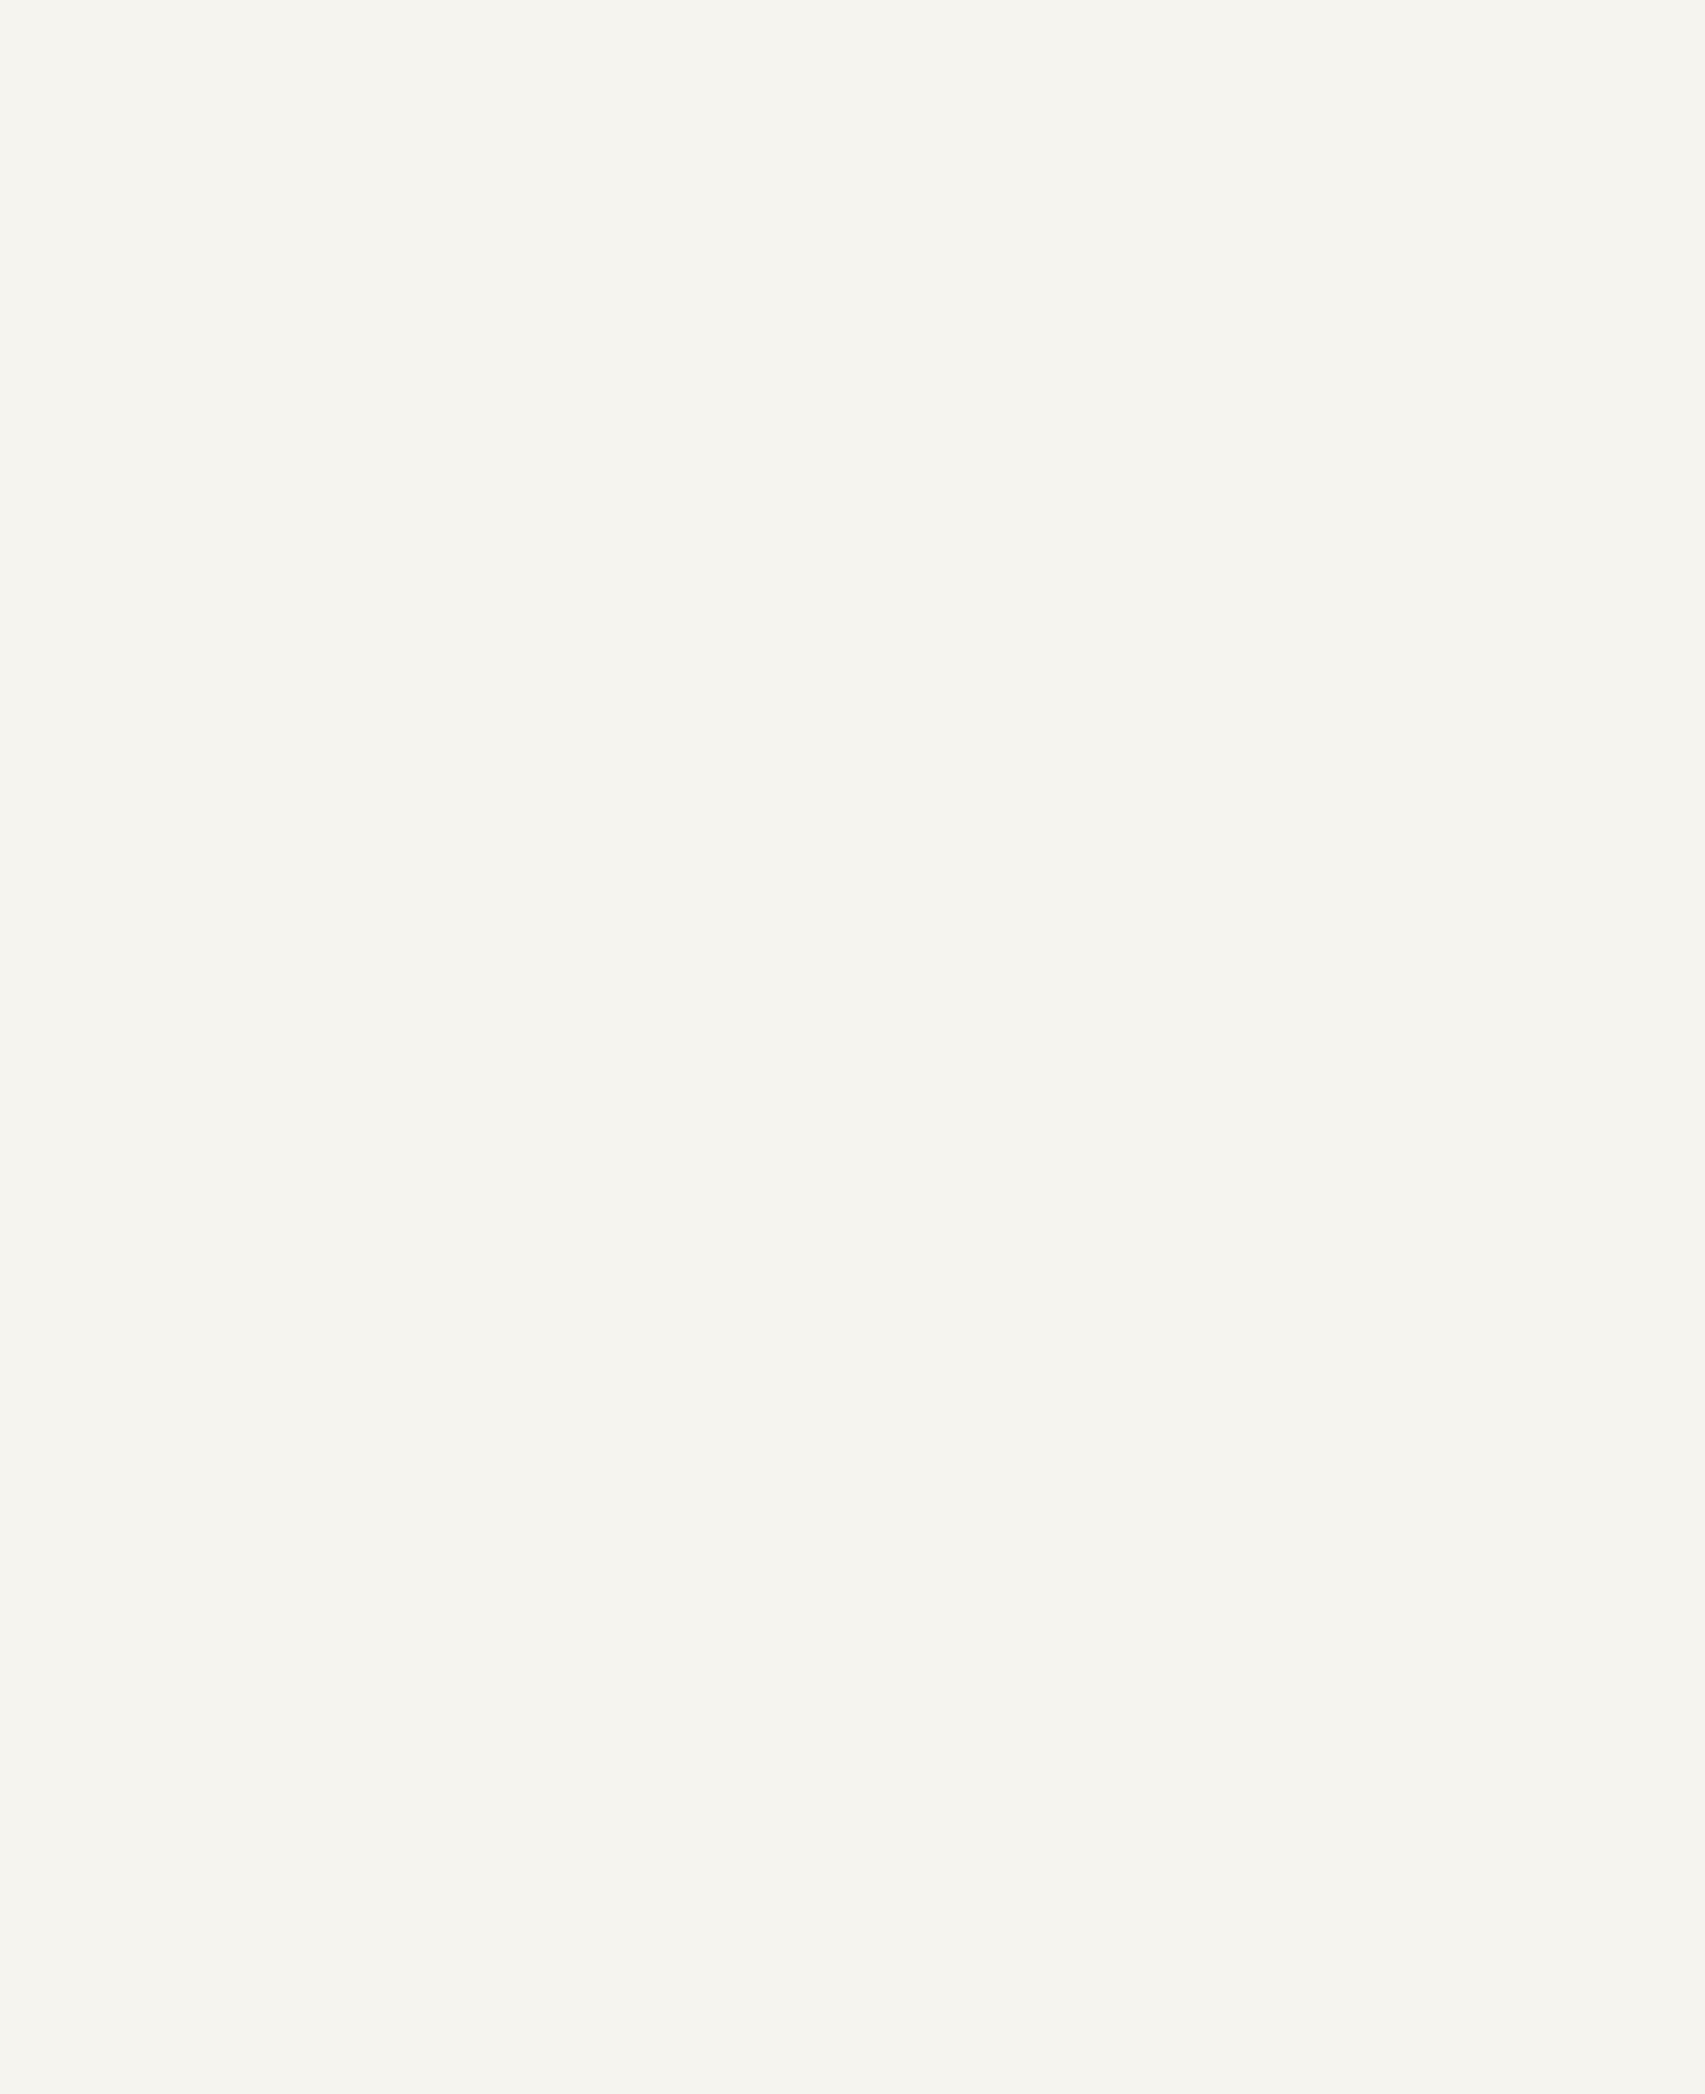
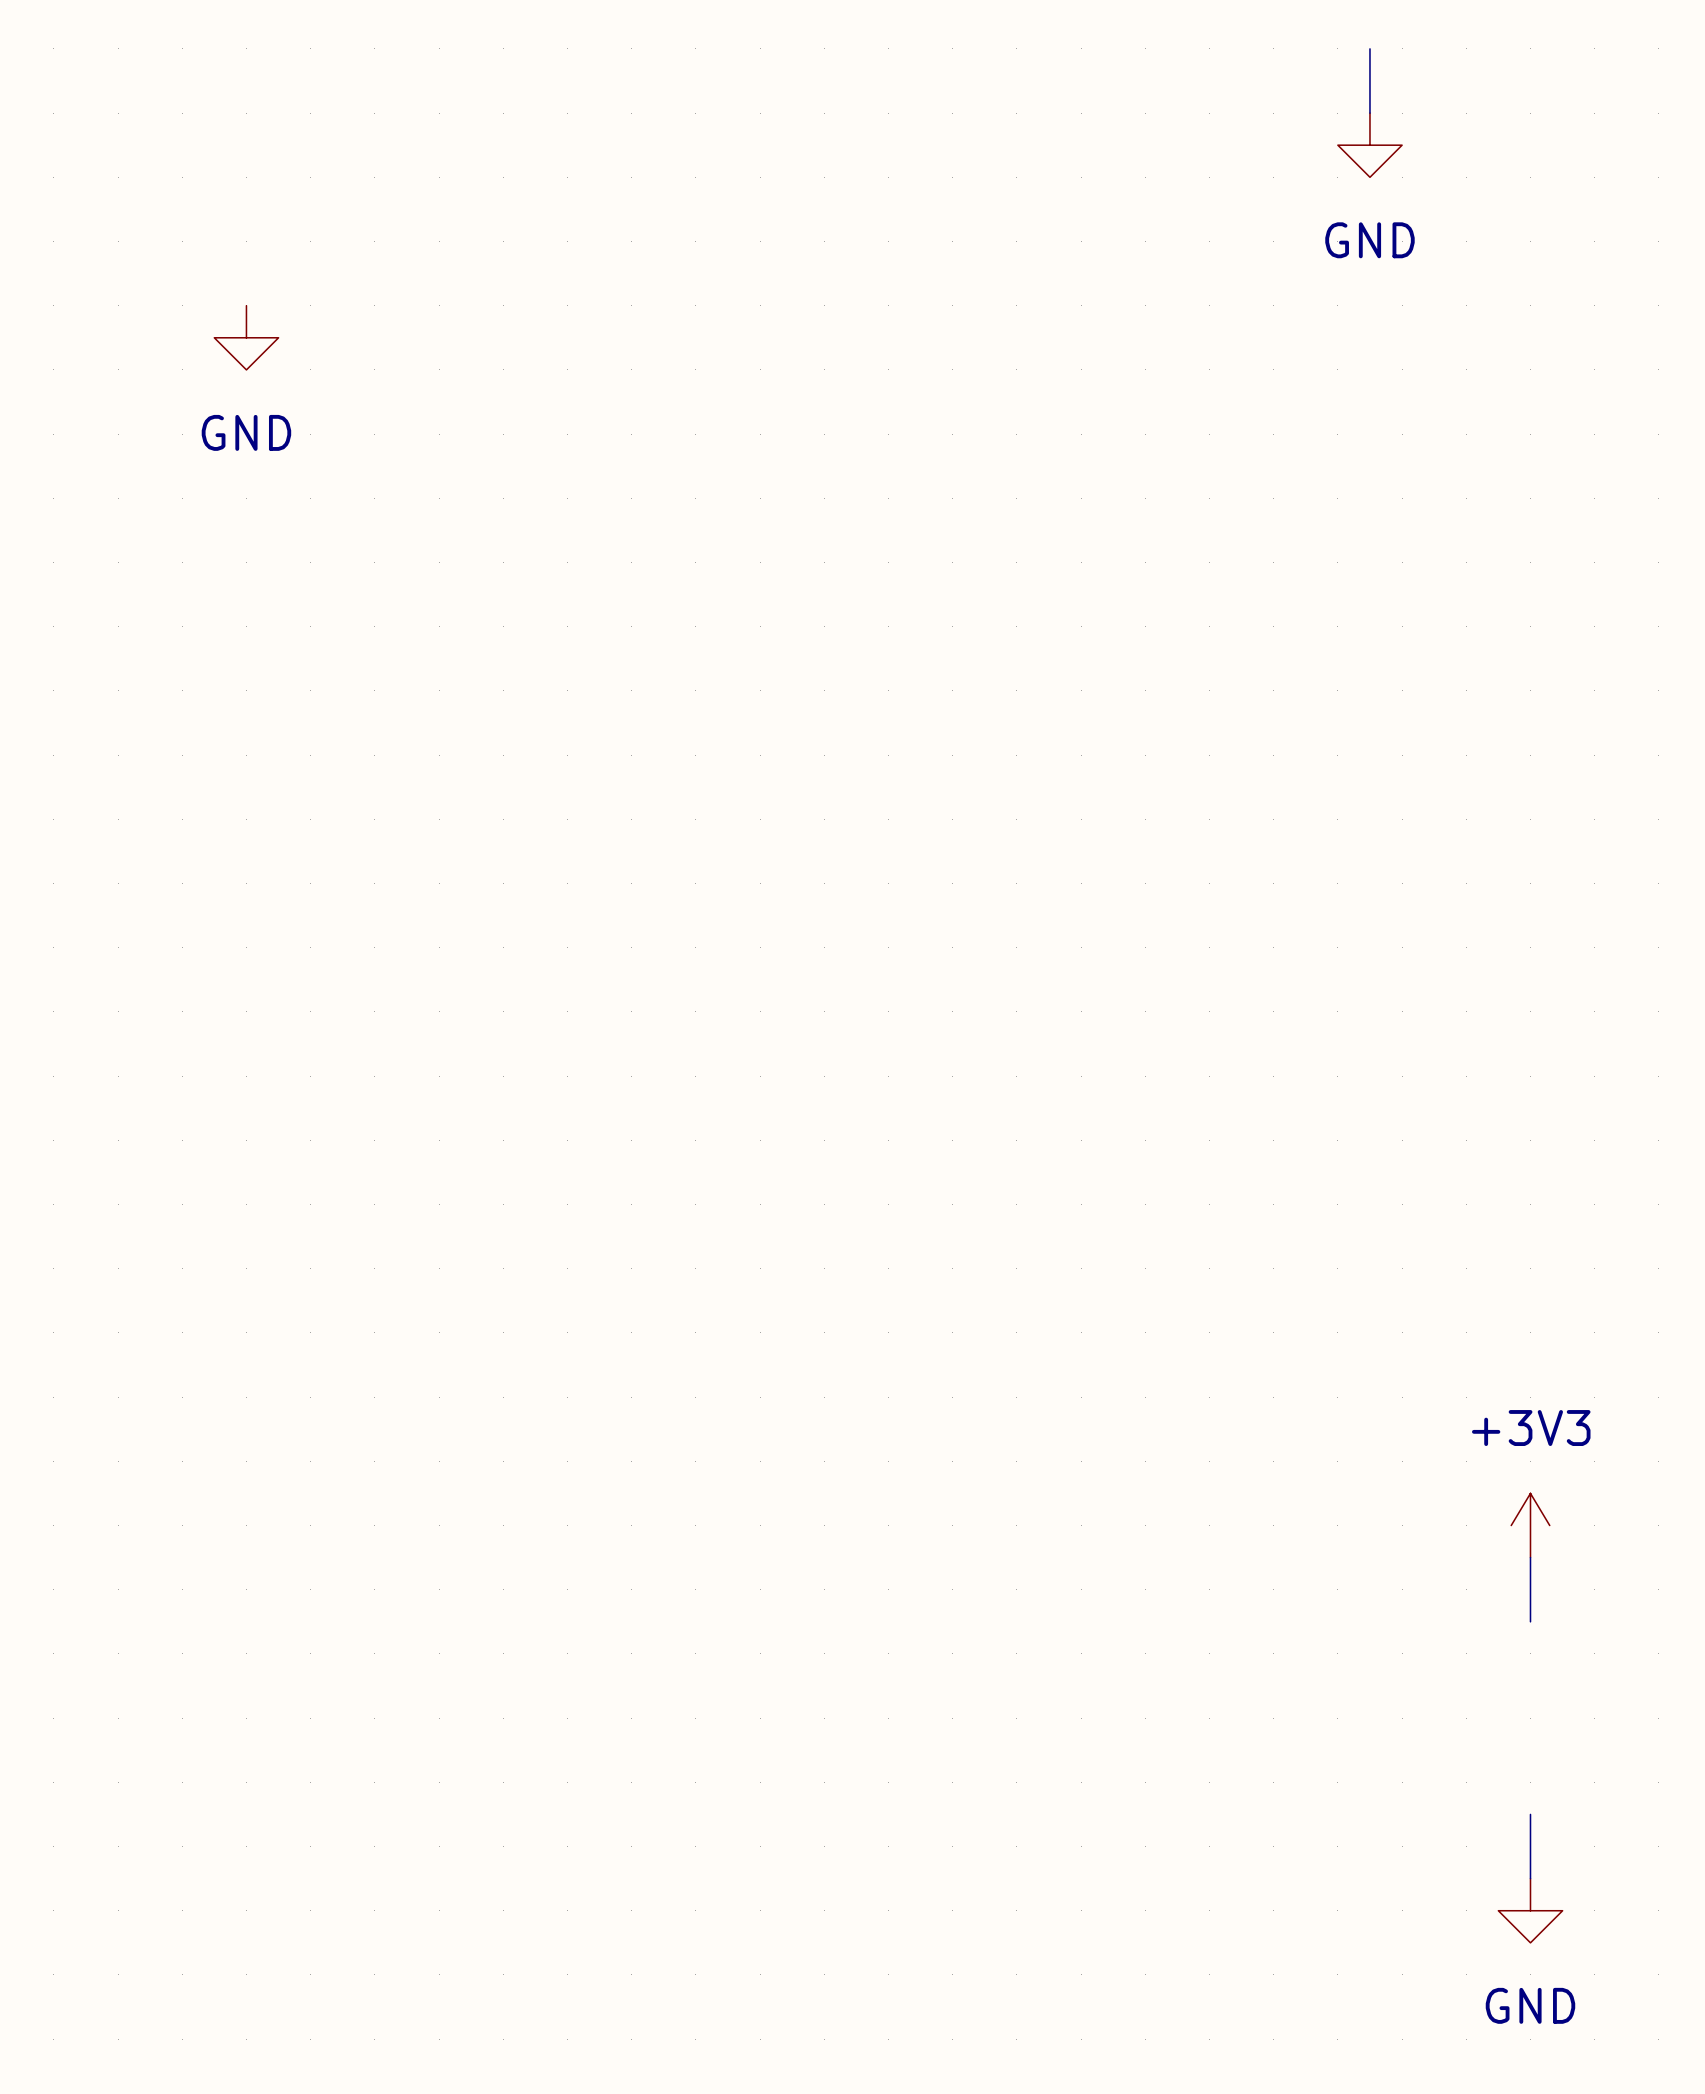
wire: none -> (1369, 48) (1369, 113)
power symbol: none -> GND (1369, 145)
power symbol: none -> GND (246, 337)
power symbol: none -> +3V3 (1530, 1525)
wire: none -> (1530, 1557) (1530, 1621)
wire: none -> (1530, 1814) (1530, 1878)
power symbol: none -> GND (1530, 1910)

